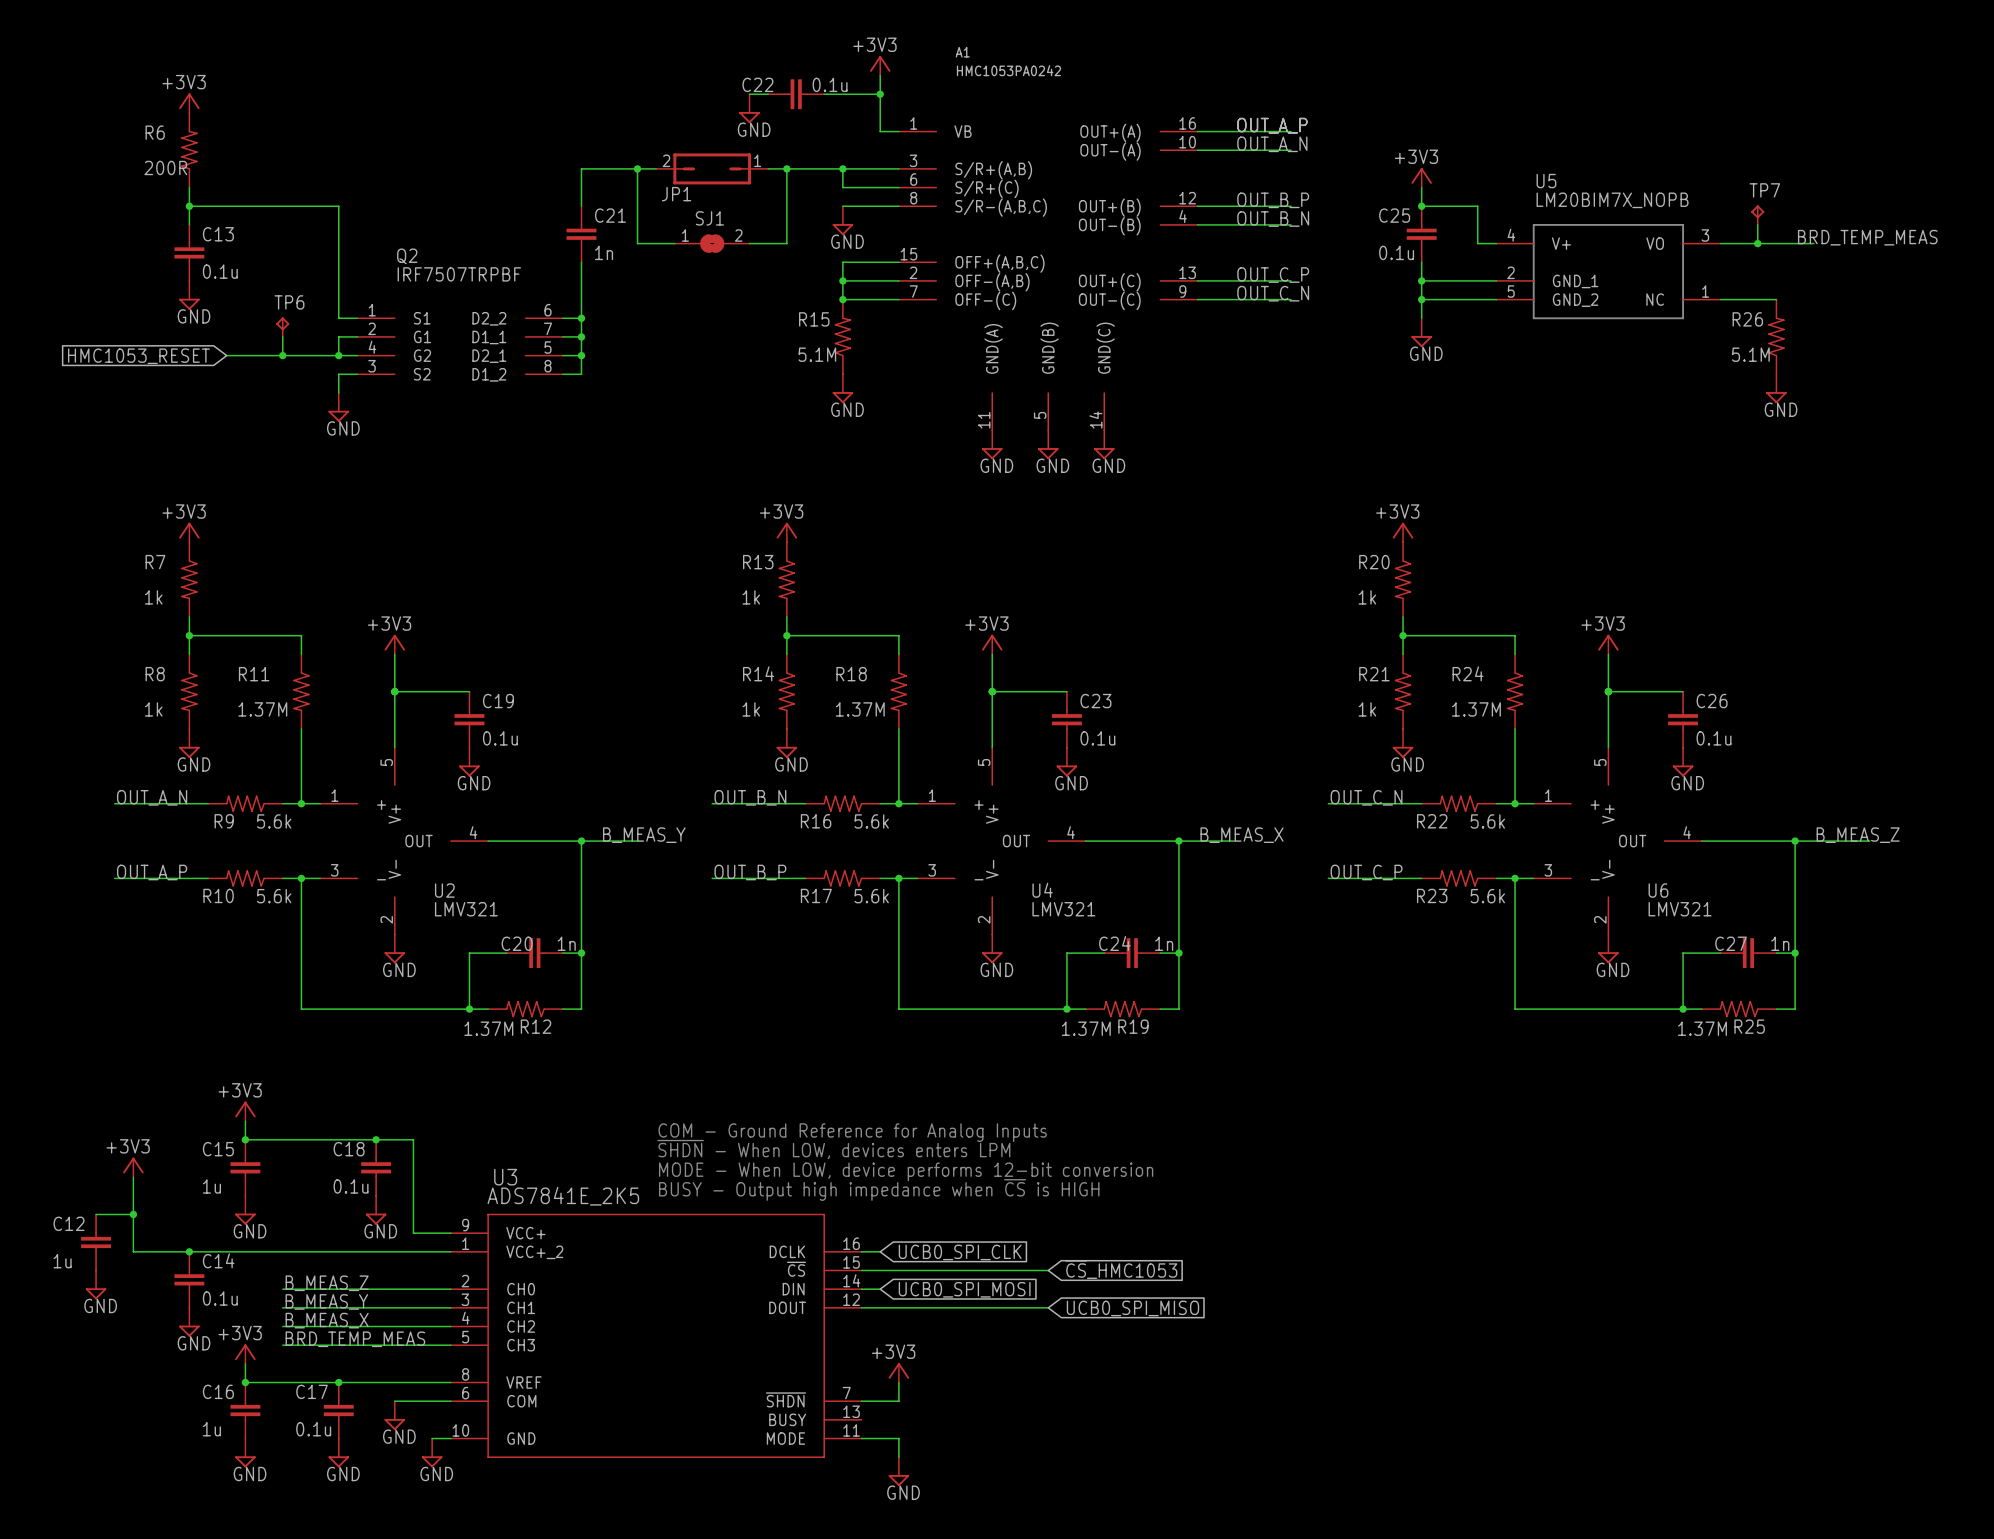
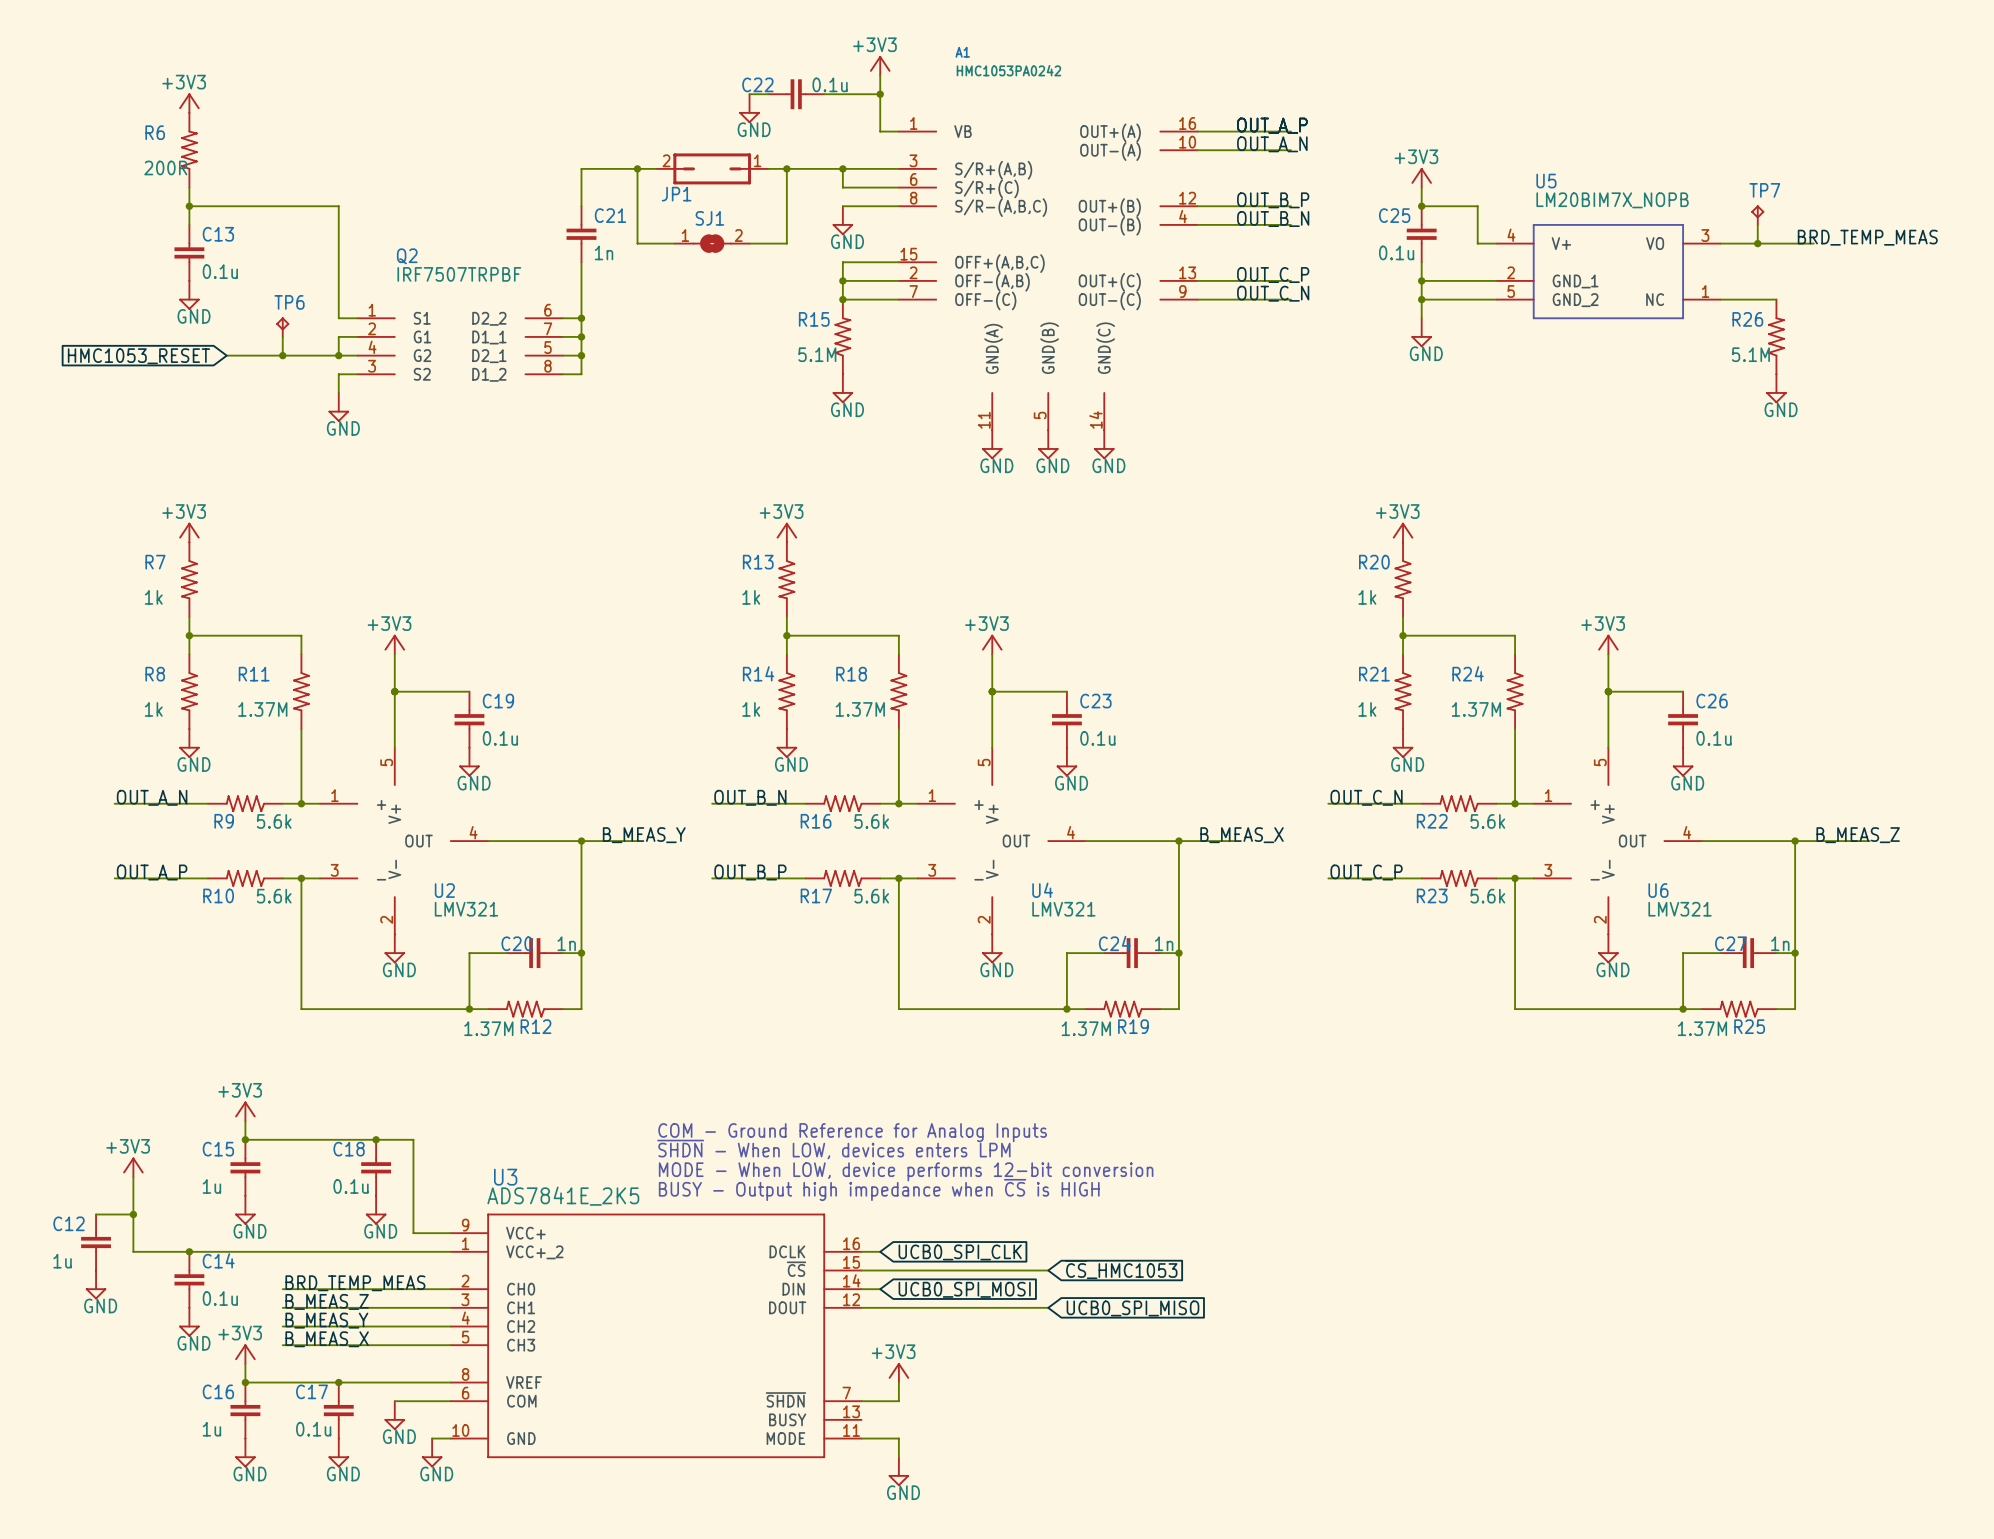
label: B_MEAS_Z (327, 1283) -> BRD_TEMP_MEAS (355, 1283)
label: B_MEAS_Y (326, 1301) -> B_MEAS_Z (327, 1301)
label: B_MEAS_X (327, 1320) -> B_MEAS_Y (326, 1320)
label: BRD_TEMP_MEAS (355, 1339) -> B_MEAS_X (327, 1339)

